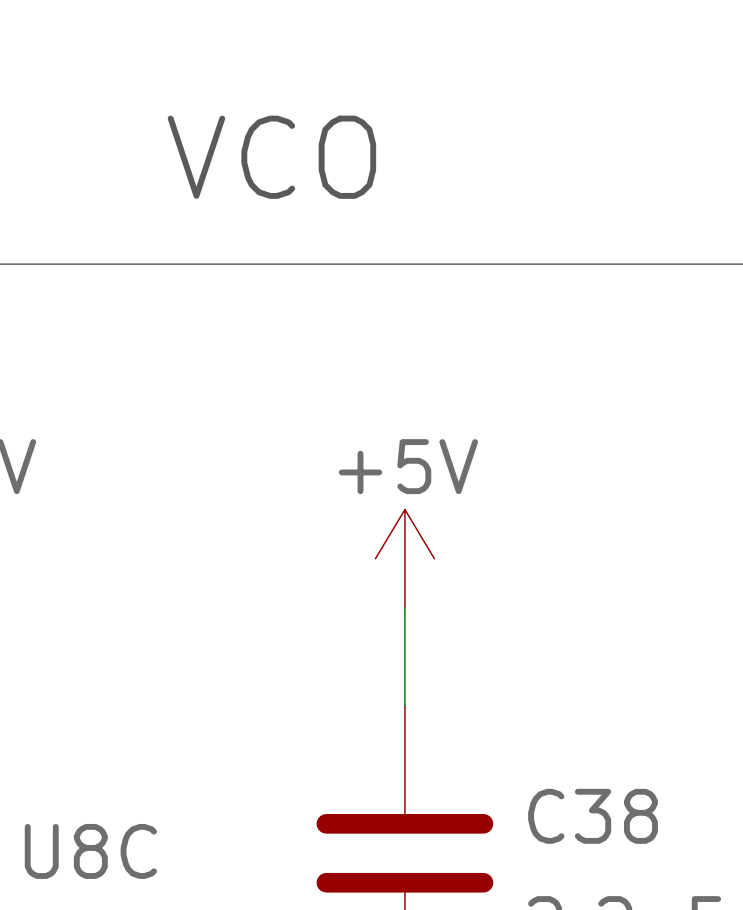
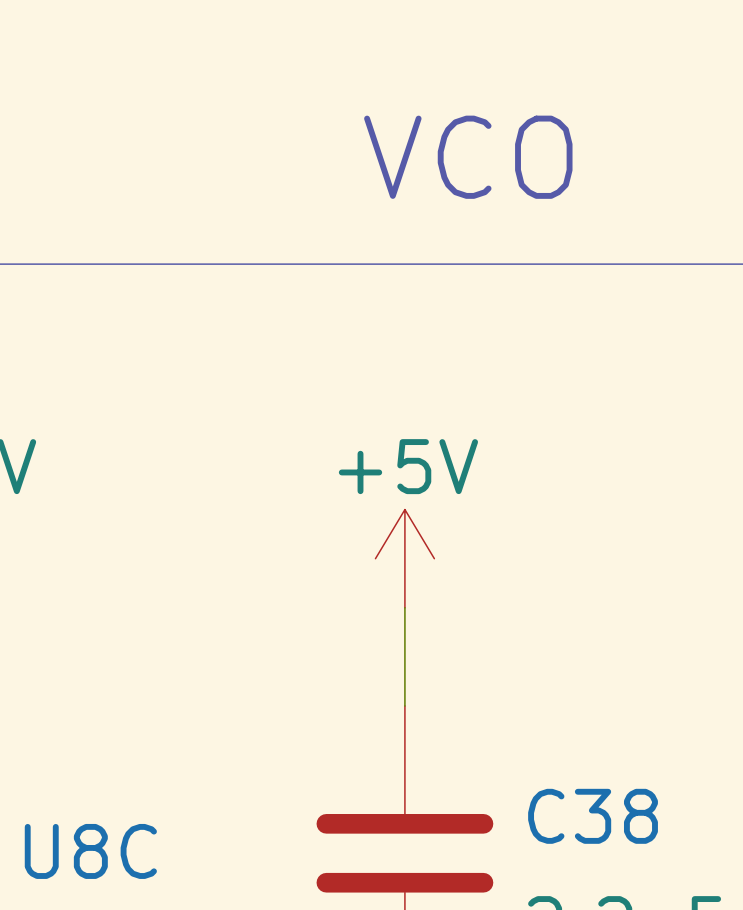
text position: VCO (271, 157) -> VCO (468, 157)

